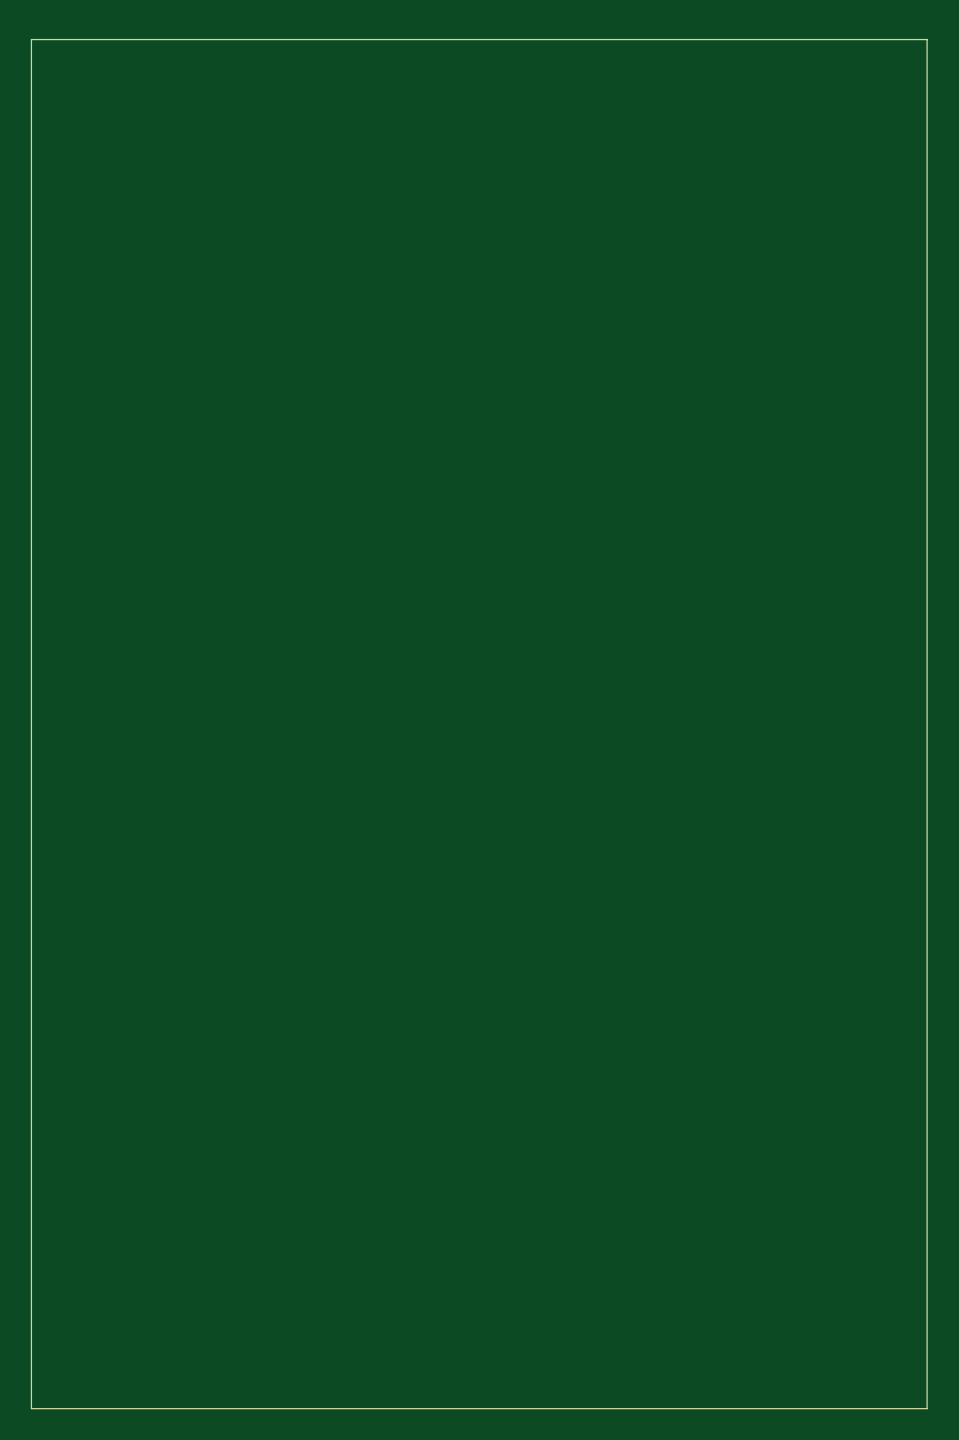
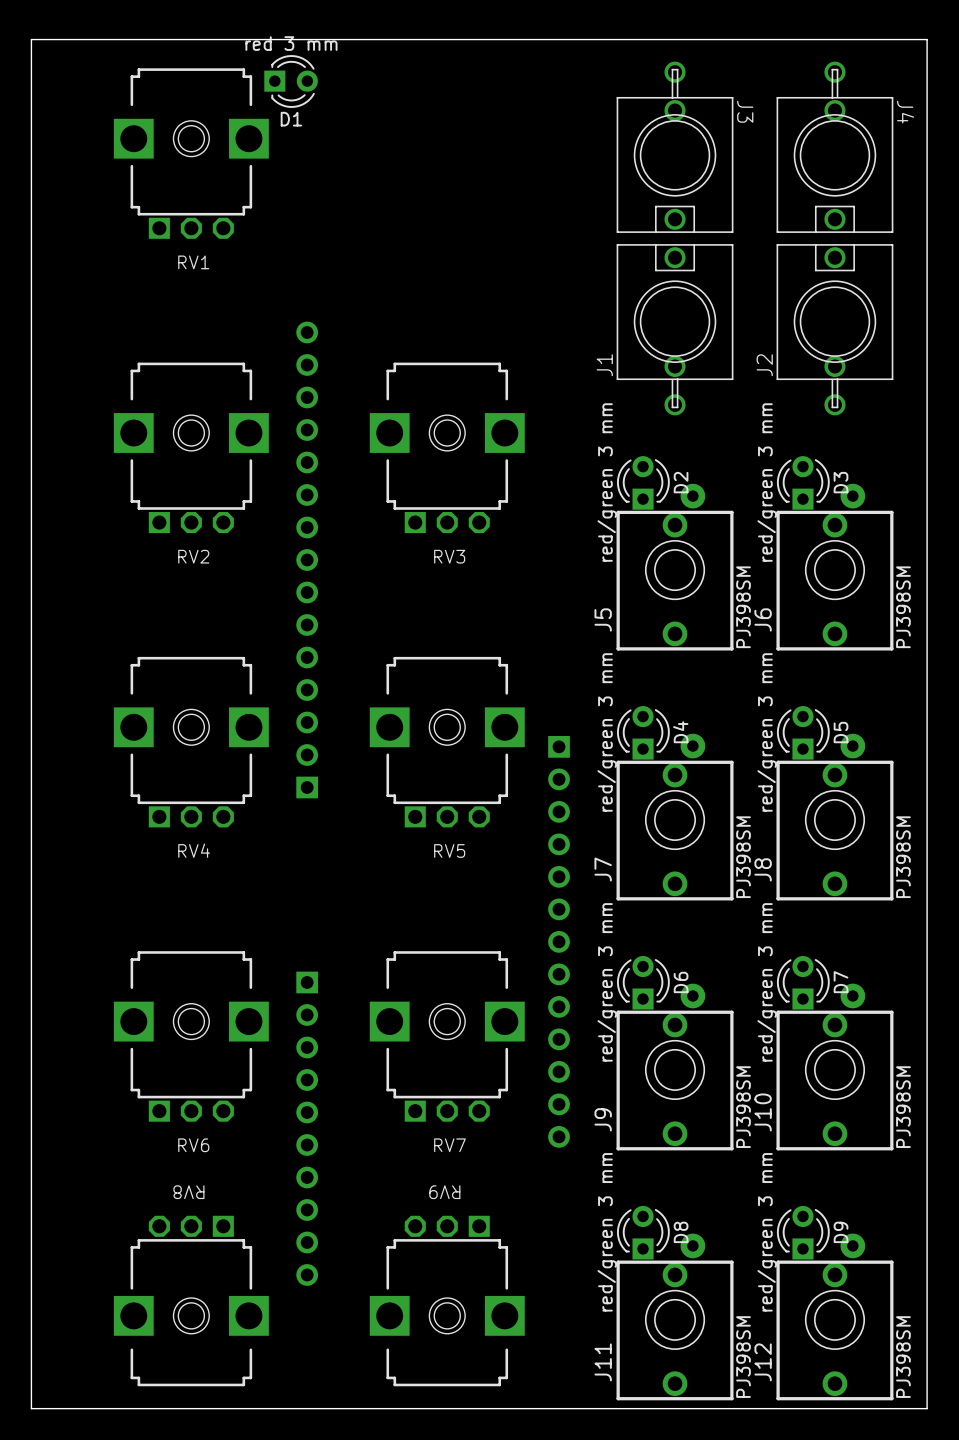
D1: none -> red 3 mm (291, 81)
J3: none -> (675, 147)
J4: none -> (834, 147)
RV1: none -> (191, 153)
J1: none -> (675, 329)
J2: none -> (834, 329)
RV2: none -> (191, 447)
RV3: none -> (447, 447)
D2: none -> red/green 3 mm (643, 482)
D3: none -> red/green 3 mm (803, 482)
part: none -> (307, 559)
J5: none -> PJ398SM (675, 567)
J6: none -> PJ398SM (834, 567)
D4: none -> red/green 3 mm (643, 732)
D5: none -> red/green 3 mm (803, 732)
RV4: none -> (191, 742)
RV5: none -> (447, 742)
J7: none -> PJ398SM (675, 817)
J8: none -> PJ398SM (834, 817)
part: none -> (559, 941)
D6: none -> red/green 3 mm (643, 982)
D7: none -> red/green 3 mm (803, 982)
RV6: none -> (191, 1036)
RV7: none -> (447, 1036)
J9: none -> PJ398SM (675, 1067)
J10: none -> PJ398SM (834, 1067)
part: none -> (307, 1128)
D8: none -> red/green 3 mm (643, 1232)
D9: none -> red/green 3 mm (803, 1232)
RV8: none -> (191, 1301)
RV9: none -> (447, 1301)
J11: none -> PJ398SM (675, 1316)
J12: none -> PJ398SM (834, 1316)

